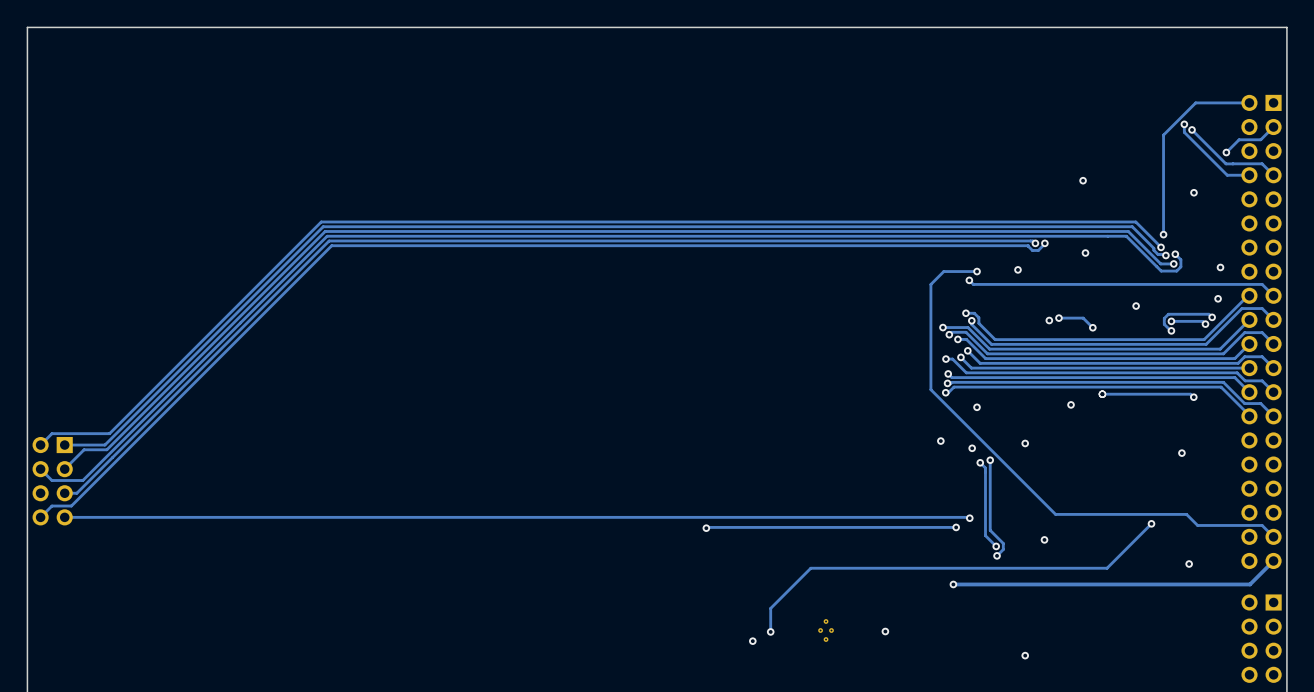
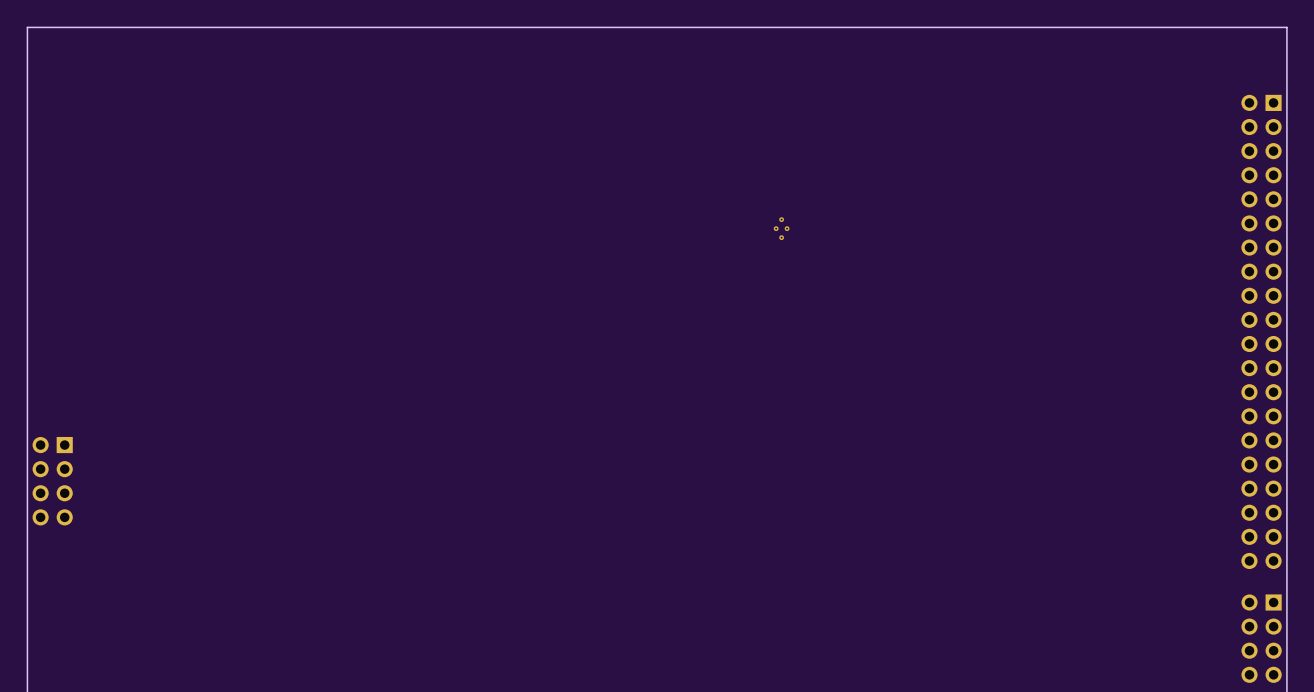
track: (1249, 102) (1195, 102) (1163, 135) (1163, 234) -> none
track: (1184, 124) (1184, 132) (1227, 175) (1249, 175) -> none
via: (1184, 124) -> none
track: (1273, 127) (1260, 139) (1239, 139) (1226, 152) -> none
track: (1192, 129) (1225, 163) (1232, 163) -> none
via: (1192, 129) -> none
via: (1226, 152) -> none
track: (1233, 163) (1262, 163) (1273, 175) -> none
via: (1083, 180) -> none
via: (1193, 192) -> none
part: none -> (781, 228)
via: (1163, 234) -> none
track: (1035, 243) (1033, 240) (329, 240) (76, 493) (64, 493) -> none
via: (1035, 243) -> none
track: (1044, 243) (1038, 250) (1032, 250) (1028, 245) (331, 245) (71, 506) (51, 506) (40, 517) -> none
via: (1044, 243) -> none
track: (1161, 247) (1135, 221) (321, 221) (109, 433) (52, 433) (40, 445) -> none
via: (1161, 247) -> none
via: (1085, 253) -> none
track: (1175, 254) (1180, 259) (1180, 266) (1176, 271) (1161, 271) (1126, 236) (327, 236) (82, 480) (51, 480) (40, 469) -> none
via: (1175, 254) -> none
track: (1165, 255) (1158, 254) (1132, 226) (323, 226) (104, 445) (64, 445) -> none
via: (1165, 255) -> none
track: (1173, 263) (1160, 263) (1128, 231) (325, 231) (106, 449) (84, 449) (64, 469) -> none
via: (1173, 263) -> none
via: (1220, 267) -> none
via: (1017, 269) -> none
track: (977, 271) (943, 271) (930, 284) (930, 389) (1055, 514) (1186, 514) (1197, 525) (1262, 525) (1273, 536) -> none
via: (977, 271) -> none
track: (969, 280) (973, 284) (1262, 284) (1273, 295) -> none
via: (969, 280) -> none
track: (1249, 295) (1204, 339) (995, 339) (978, 323) (978, 317) (974, 313) (965, 313) -> none
via: (1218, 298) -> none
via: (1136, 306) -> none
via: (965, 313) -> none
track: (1212, 317) (1209, 314) (1168, 314) (1164, 318) (1164, 324) (1171, 330) -> none
via: (1212, 317) -> none
track: (1058, 318) (1083, 318) (1092, 327) -> none
via: (1058, 318) -> none
track: (1249, 319) (1220, 349) (989, 349) (968, 327) (942, 327) -> none
track: (1273, 319) (1262, 308) (1241, 308) (1206, 344) (991, 344) (971, 324) (971, 320) -> none
via: (971, 320) -> none
via: (1049, 320) -> none
track: (1171, 321) (1202, 321) (1205, 324) -> none
via: (1171, 321) -> none
via: (1205, 324) -> none
via: (942, 327) -> none
via: (1092, 327) -> none
via: (1171, 330) -> none
track: (949, 334) (951, 332) (966, 332) (987, 353) (1223, 353) (1244, 332) (1262, 332) (1273, 344) -> none
via: (949, 334) -> none
track: (957, 339) (966, 339) (985, 358) (1234, 358) (1249, 344) -> none
via: (957, 339) -> none
track: (967, 350) (980, 363) (1238, 363) (1244, 356) (1262, 356) (1273, 368) -> none
via: (967, 350) -> none
track: (960, 357) (971, 368) (1249, 368) -> none
via: (960, 357) -> none
track: (945, 359) (952, 359) (966, 372) (1237, 372) (1245, 380) (1262, 380) (1273, 392) -> none
via: (945, 359) -> none
track: (948, 373) (951, 377) (1234, 377) (1249, 392) -> none
via: (948, 373) -> none
track: (947, 383) (1223, 382) (1244, 403) (1260, 403) (1273, 416) -> none
via: (947, 383) -> none
track: (945, 392) (954, 387) (1221, 387) (1249, 416) -> none
via: (945, 392) -> none
track: (1102, 394) (1190, 394) (1193, 397) -> none
via: (1102, 394) -> none
via: (1193, 397) -> none
via: (1071, 404) -> none
via: (977, 407) -> none
via: (940, 441) -> none
via: (1025, 443) -> none
via: (972, 448) -> none
via: (1181, 453) -> none
track: (990, 460) (990, 530) (1003, 543) (1003, 549) (997, 555) -> none
via: (990, 460) -> none
track: (980, 462) (985, 468) (985, 535) (996, 546) -> none
via: (980, 462) -> none
track: (64, 517) (969, 518) -> none
via: (969, 518) -> none
track: (1151, 523) (1107, 568) (810, 568) (770, 608) (770, 631) -> none
via: (1151, 523) -> none
track: (956, 527) (706, 528) -> none
via: (956, 527) -> none
via: (706, 528) -> none
via: (1044, 539) -> none
via: (996, 546) -> none
via: (997, 555) -> none
track: (1273, 560) (1250, 584) (953, 584) -> none
via: (1189, 564) -> none
via: (953, 584) -> none
part: (826, 630) -> none
via: (770, 631) -> none
via: (885, 631) -> none
via: (752, 641) -> none
via: (1025, 655) -> none

